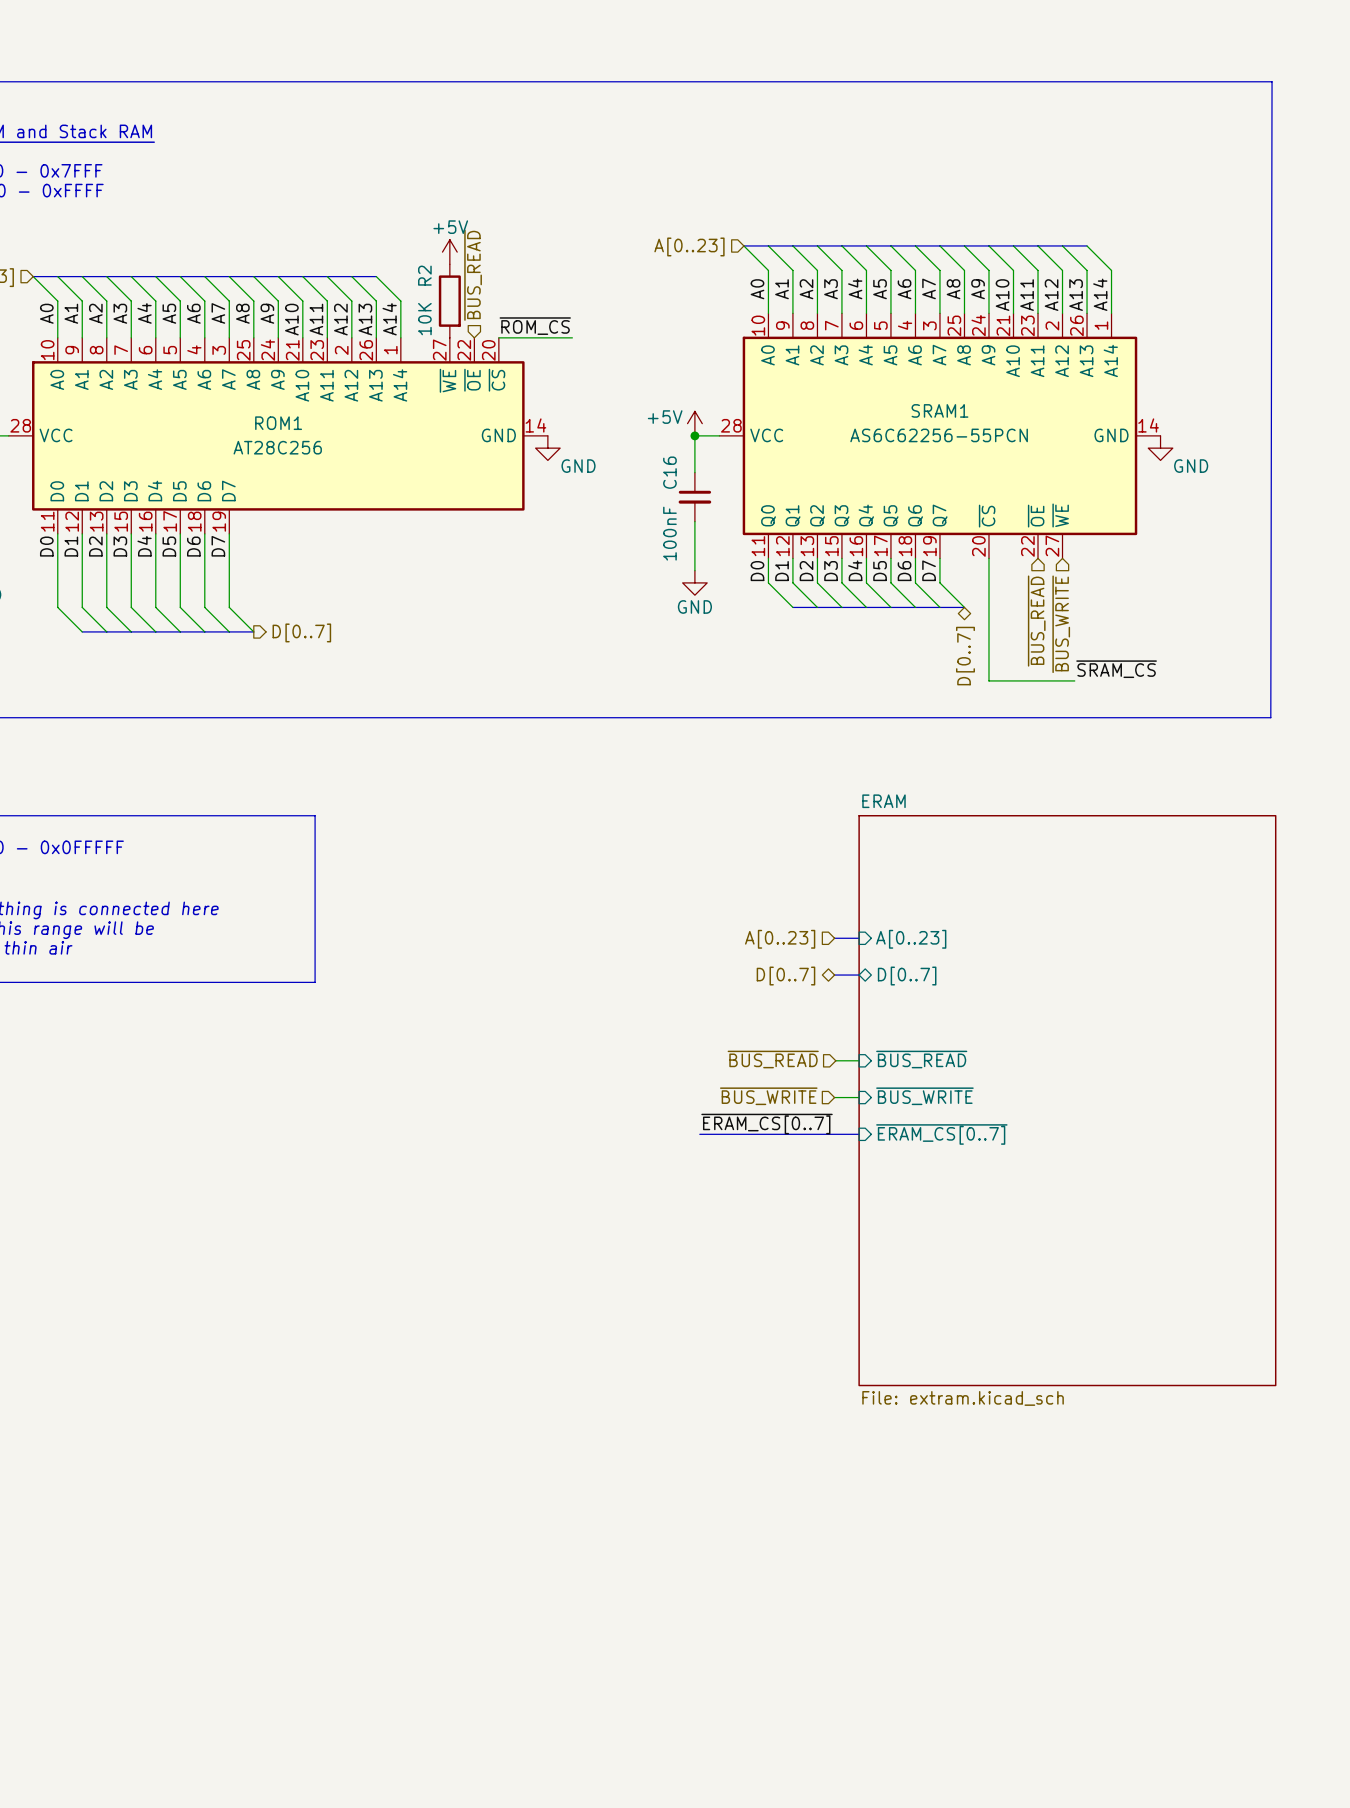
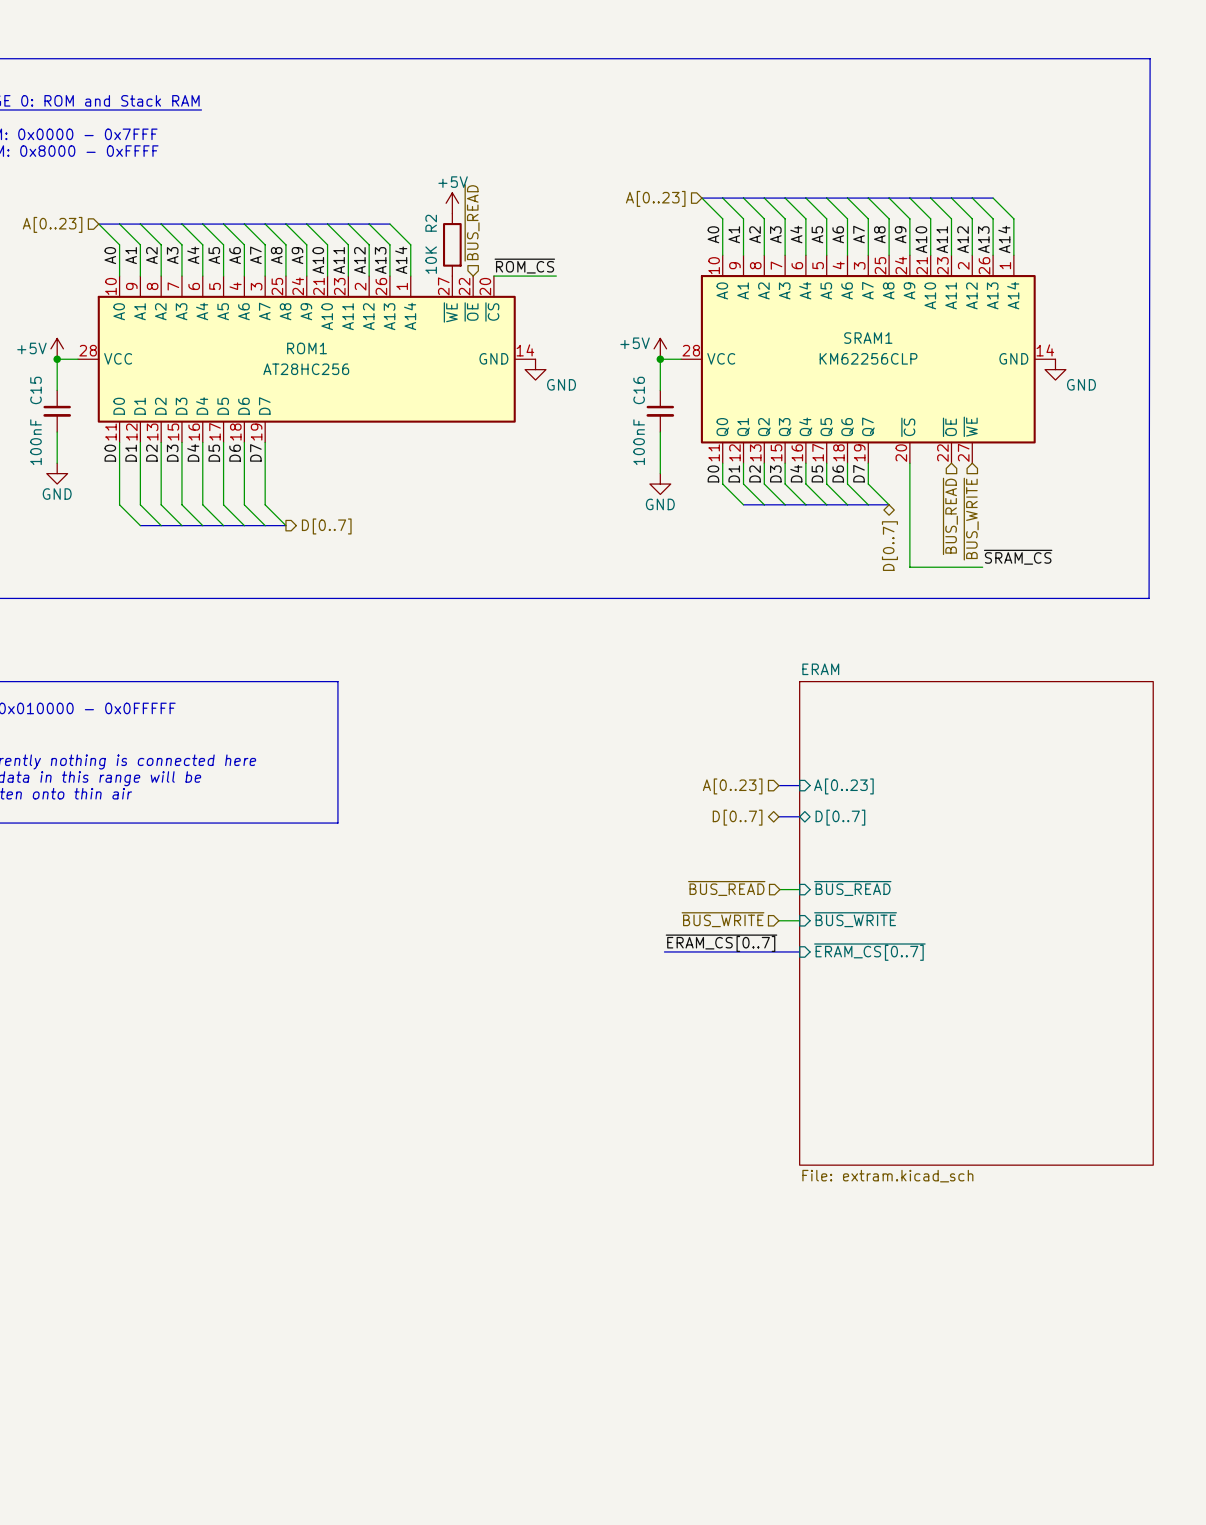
SRAM1 value: AS6C62256-55PCN (939, 435) -> KM62256CLP (868, 358)
ROM1 value: AT28C256 (277, 447) -> AT28HC256 (306, 369)

